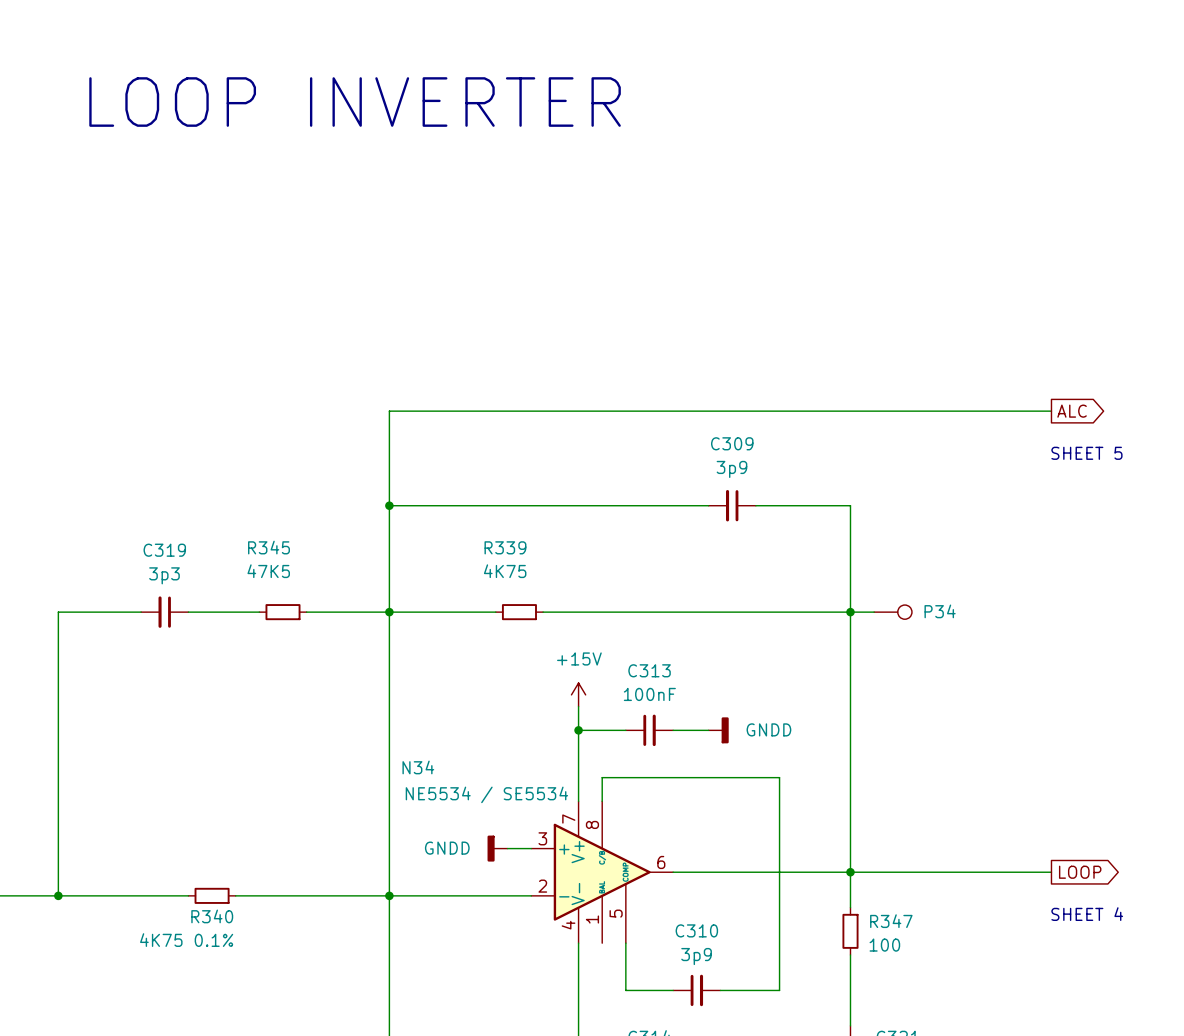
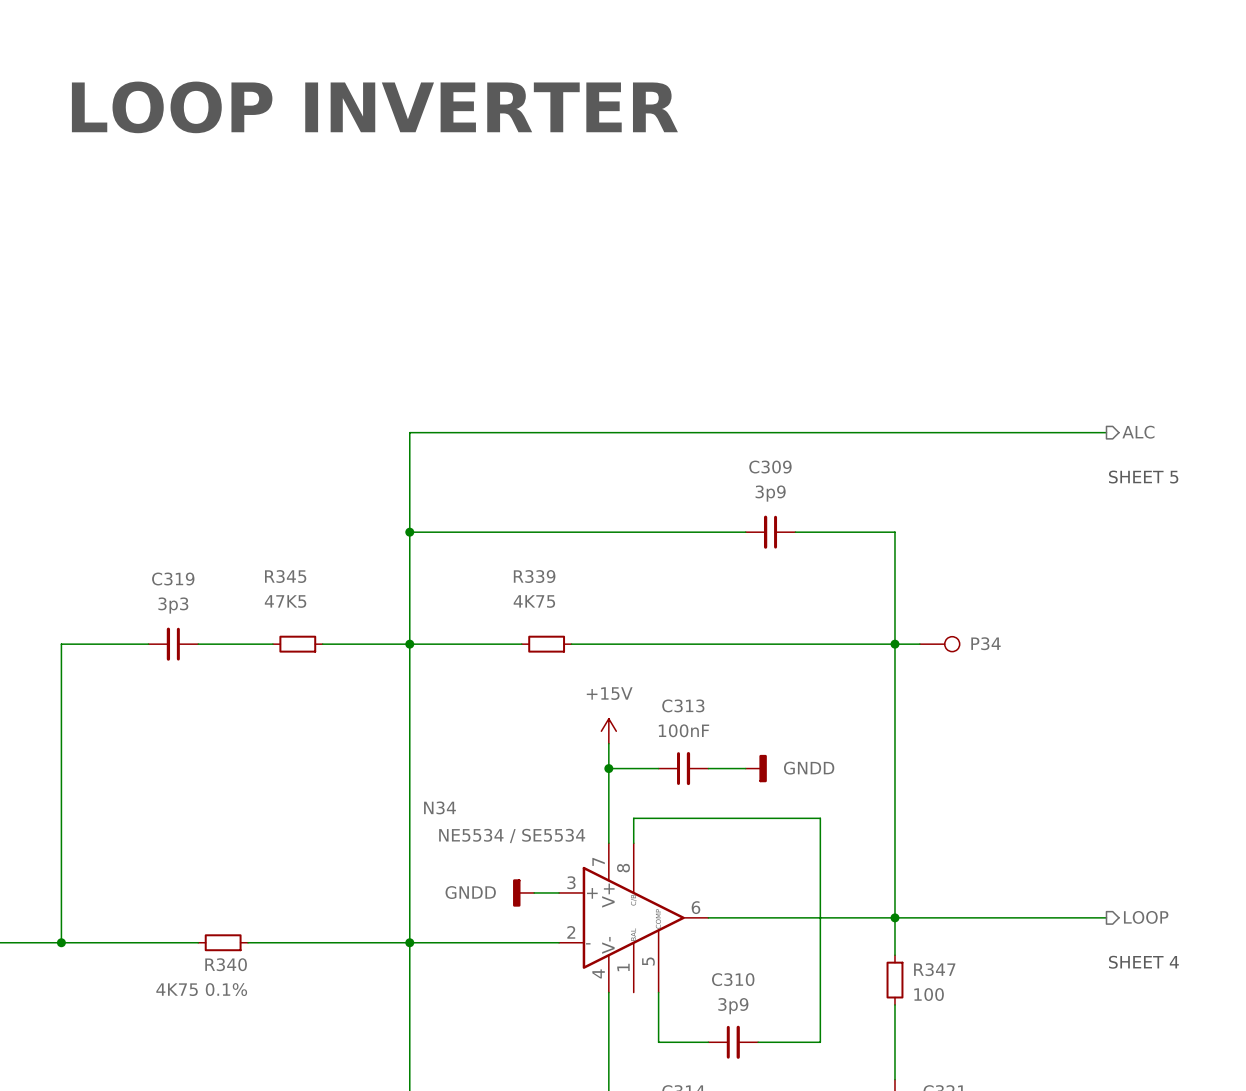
hierarchical label: none -> ALC (1138, 432)
global label: ALC (1072, 411) -> none
hierarchical label: none -> LOOP (1146, 917)
global label: LOOP (1080, 872) -> none

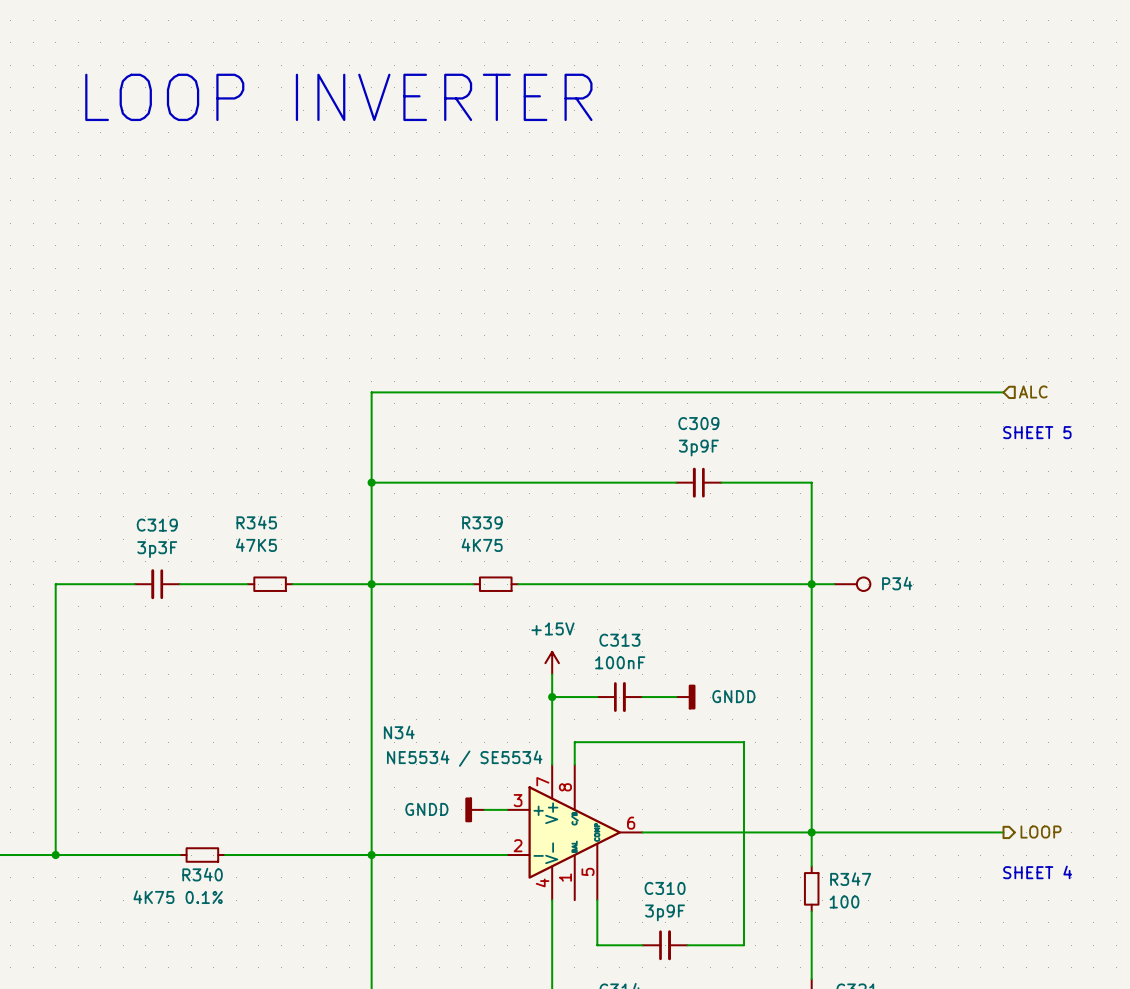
hierarchical label shape: output (1138, 432) -> input (1033, 391)
C309 value: 3p9 (770, 493) -> 3p9F (698, 448)
C319 value: 3p3 (173, 605) -> 3p3F (157, 549)
C310 value: 3p9 (733, 1006) -> 3p9F (665, 912)

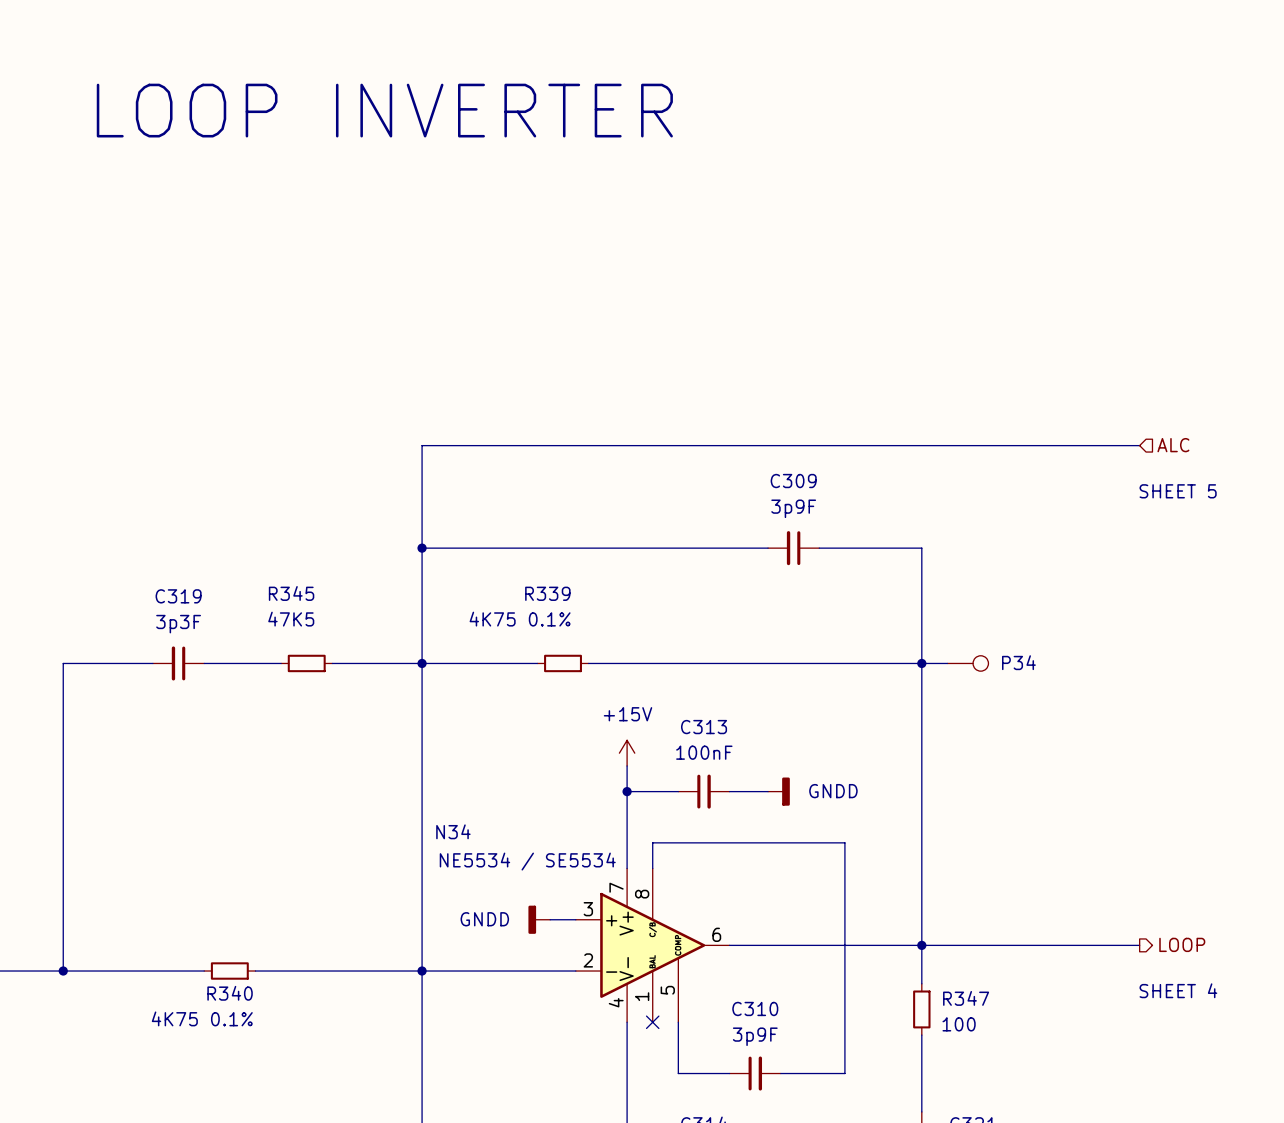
R339 value: 4K75 (482, 545) -> 4K75 0.1% (520, 619)
no-connect mark: none -> (652, 1022)

